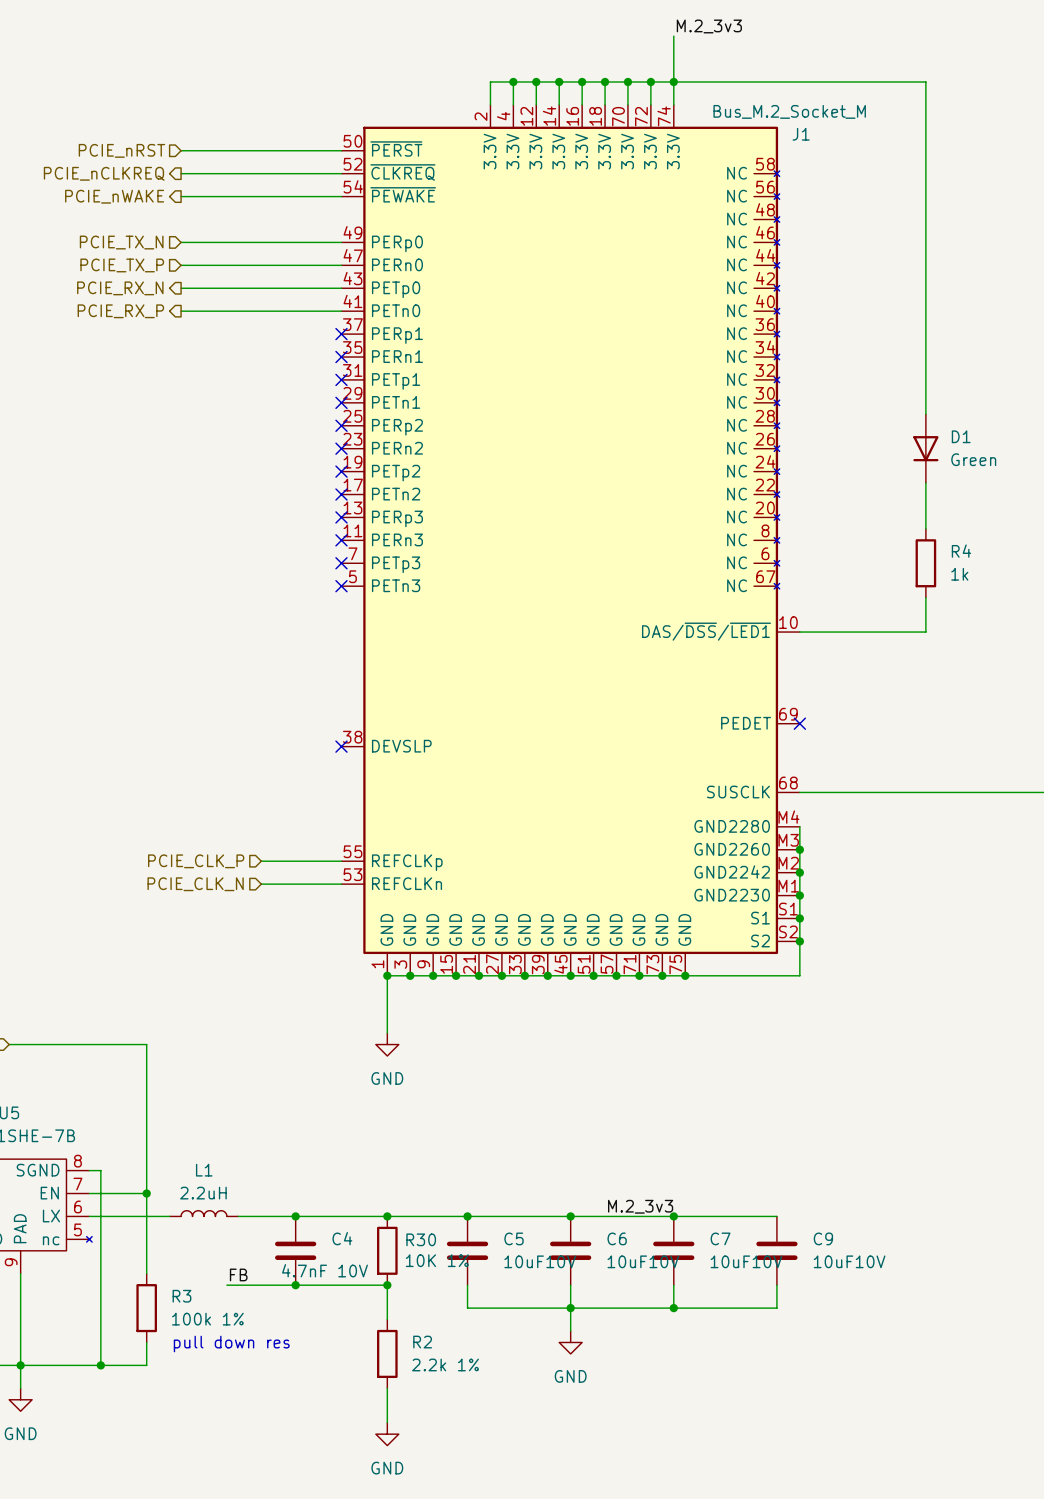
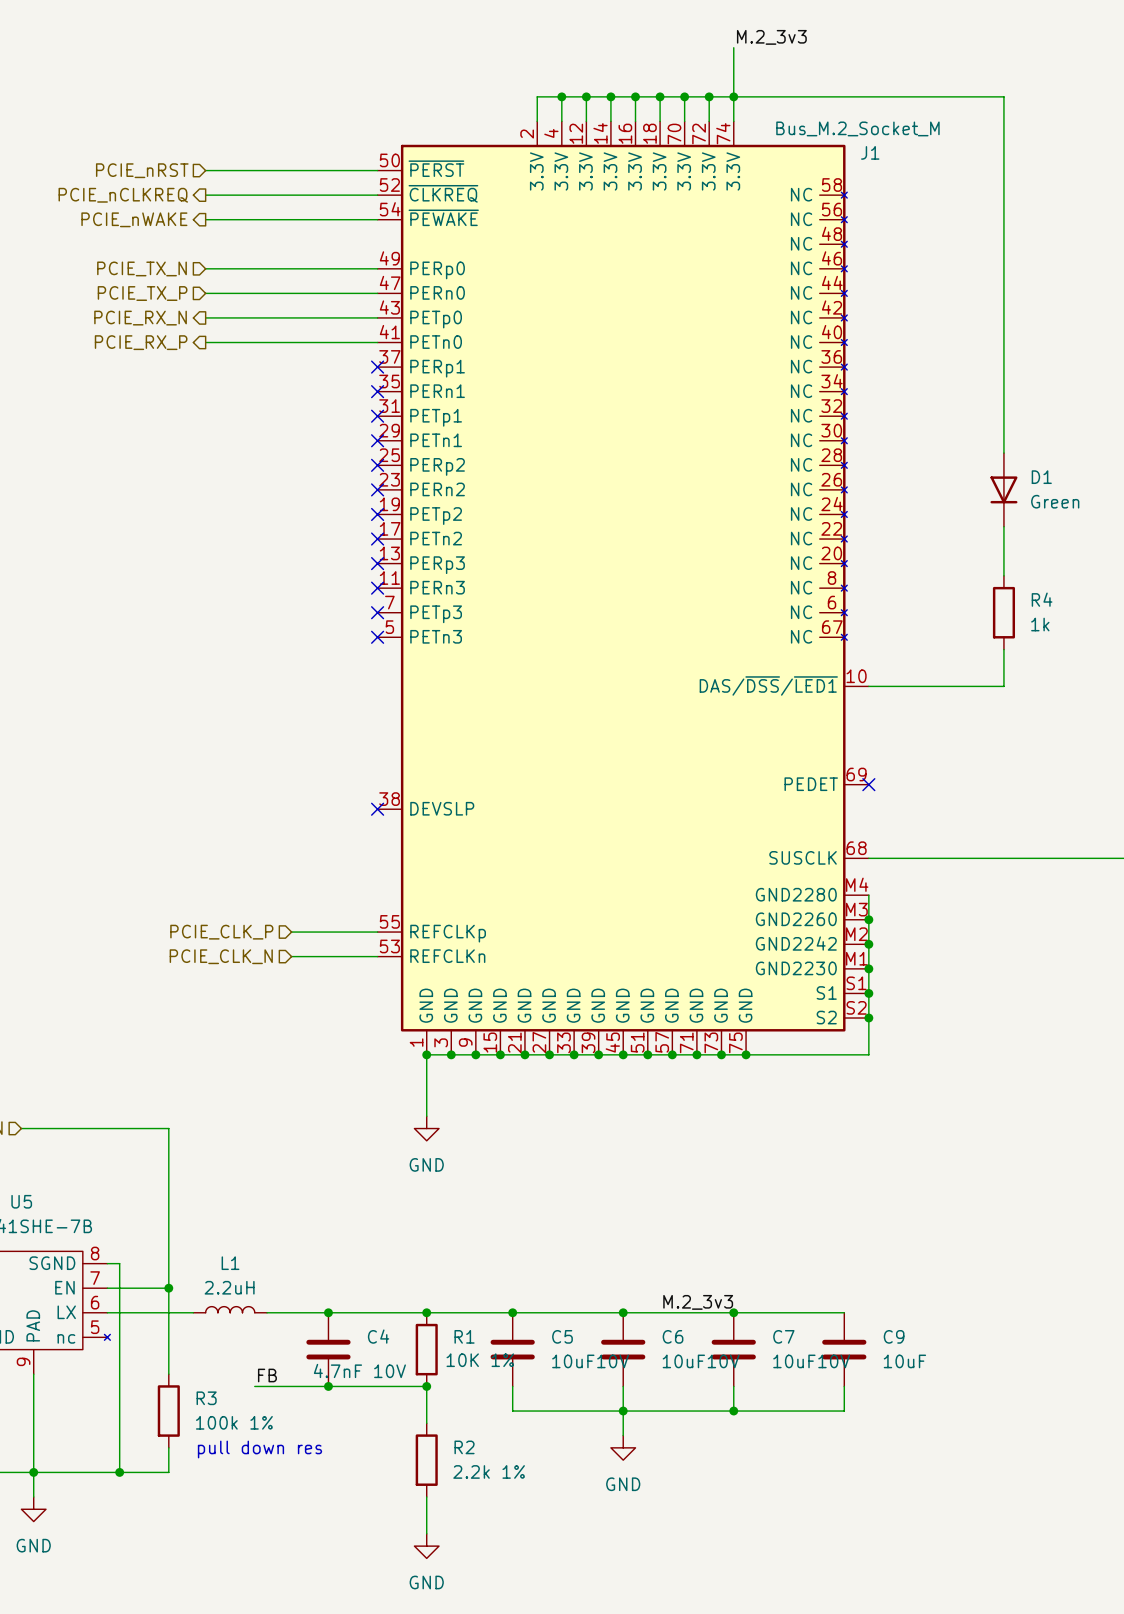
R30 name: R30 (421, 1239) -> R1 (464, 1336)
C9 value: 10uF10V (849, 1261) -> 10uF (904, 1361)

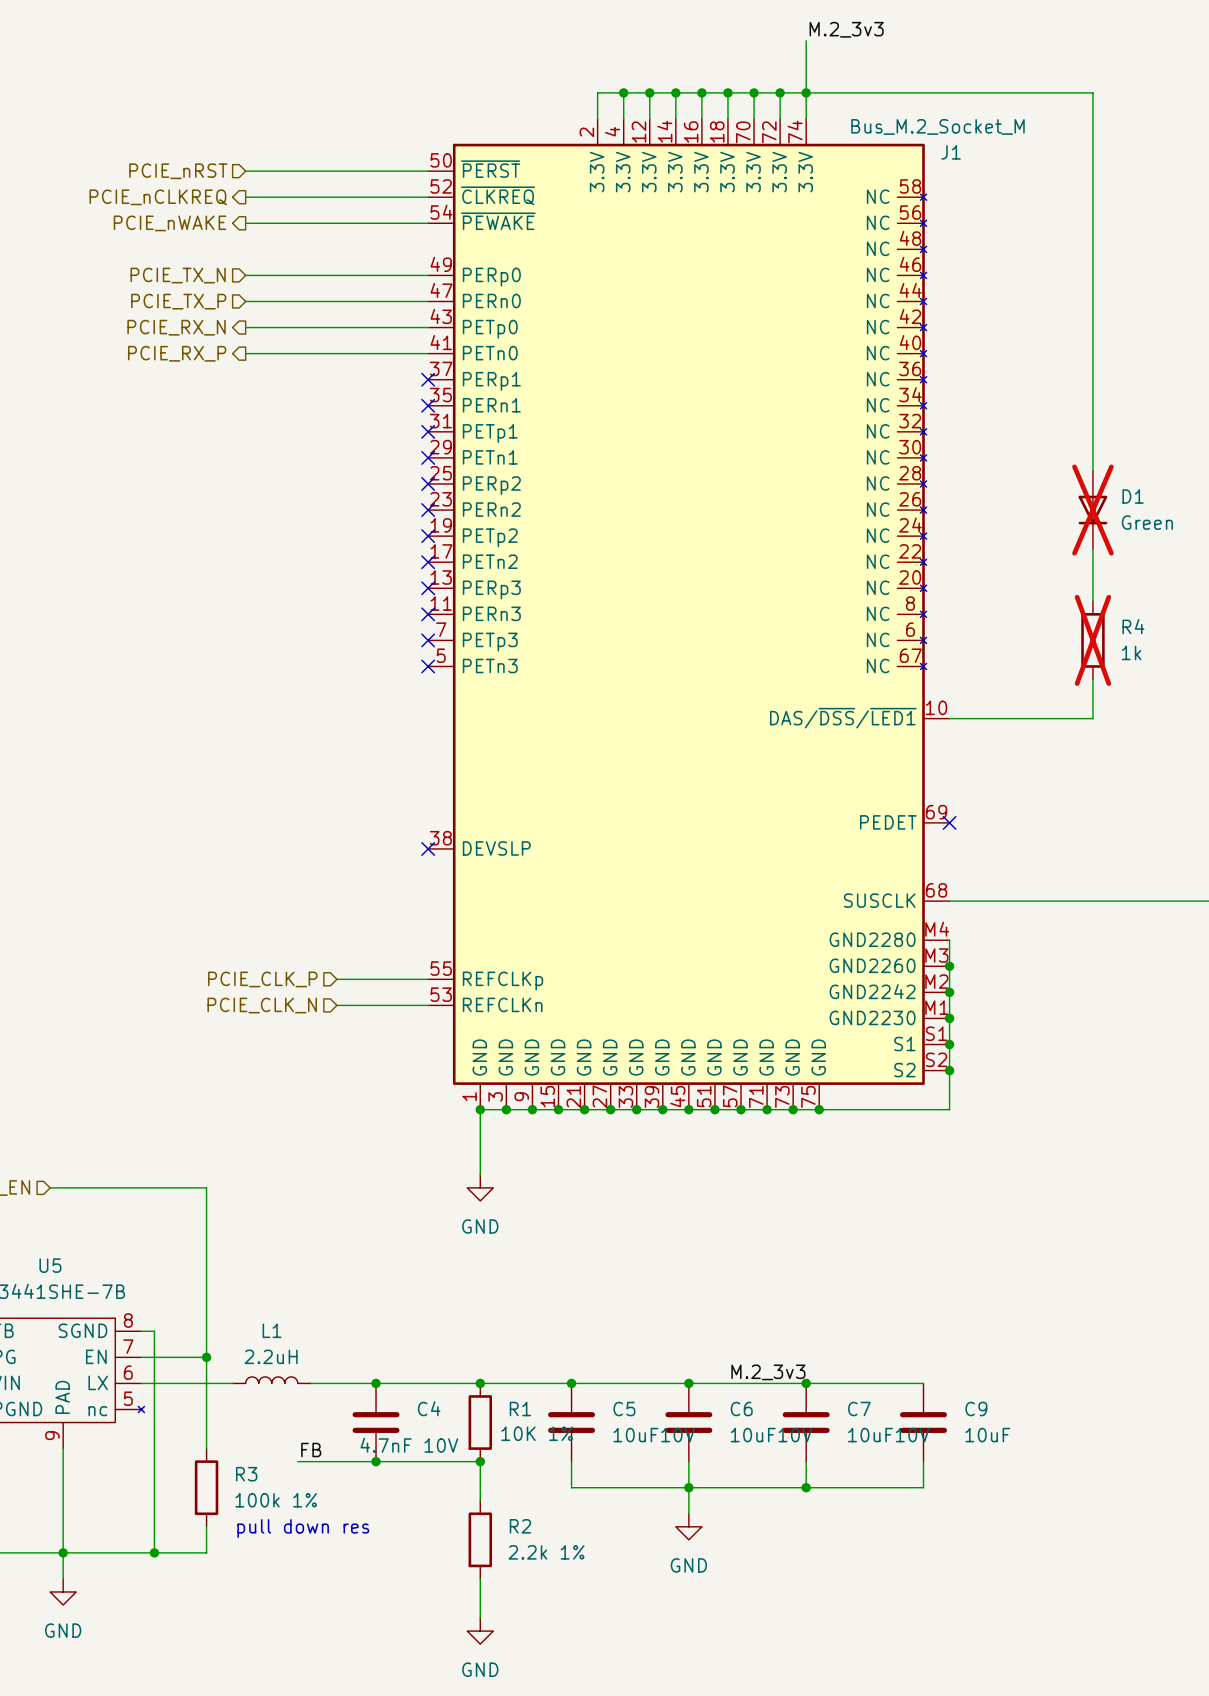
D1 do-not-place cross: none -> (1092, 510)
R4 do-not-place cross: none -> (1092, 640)

